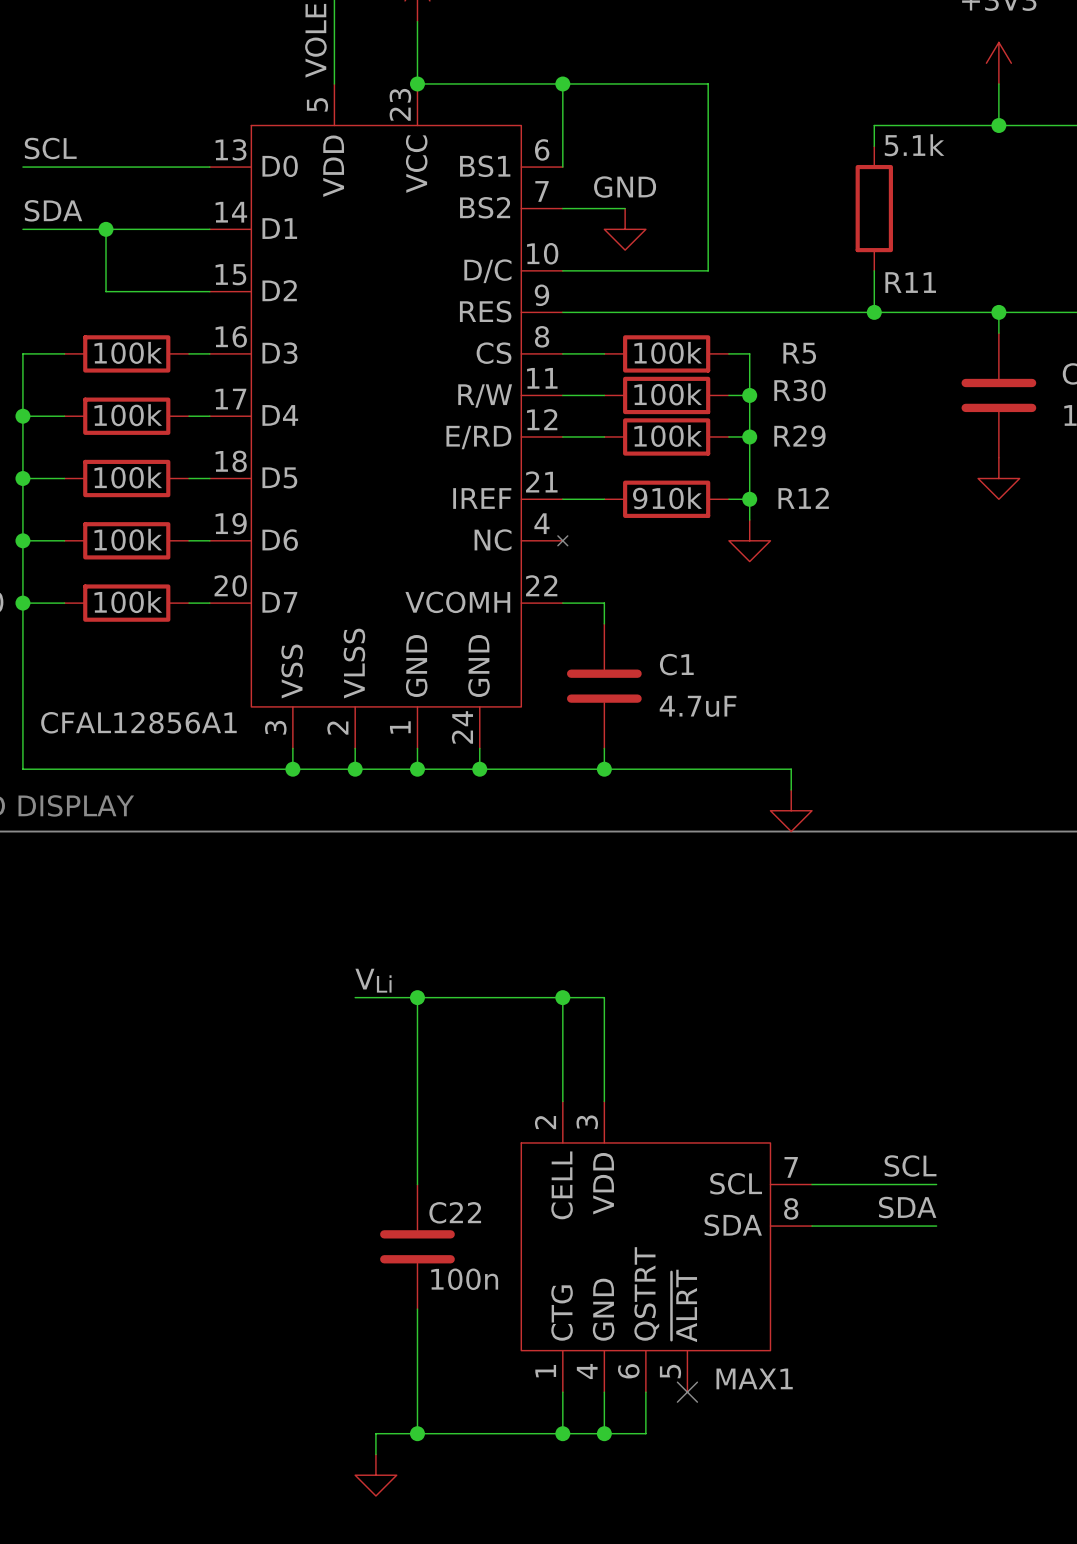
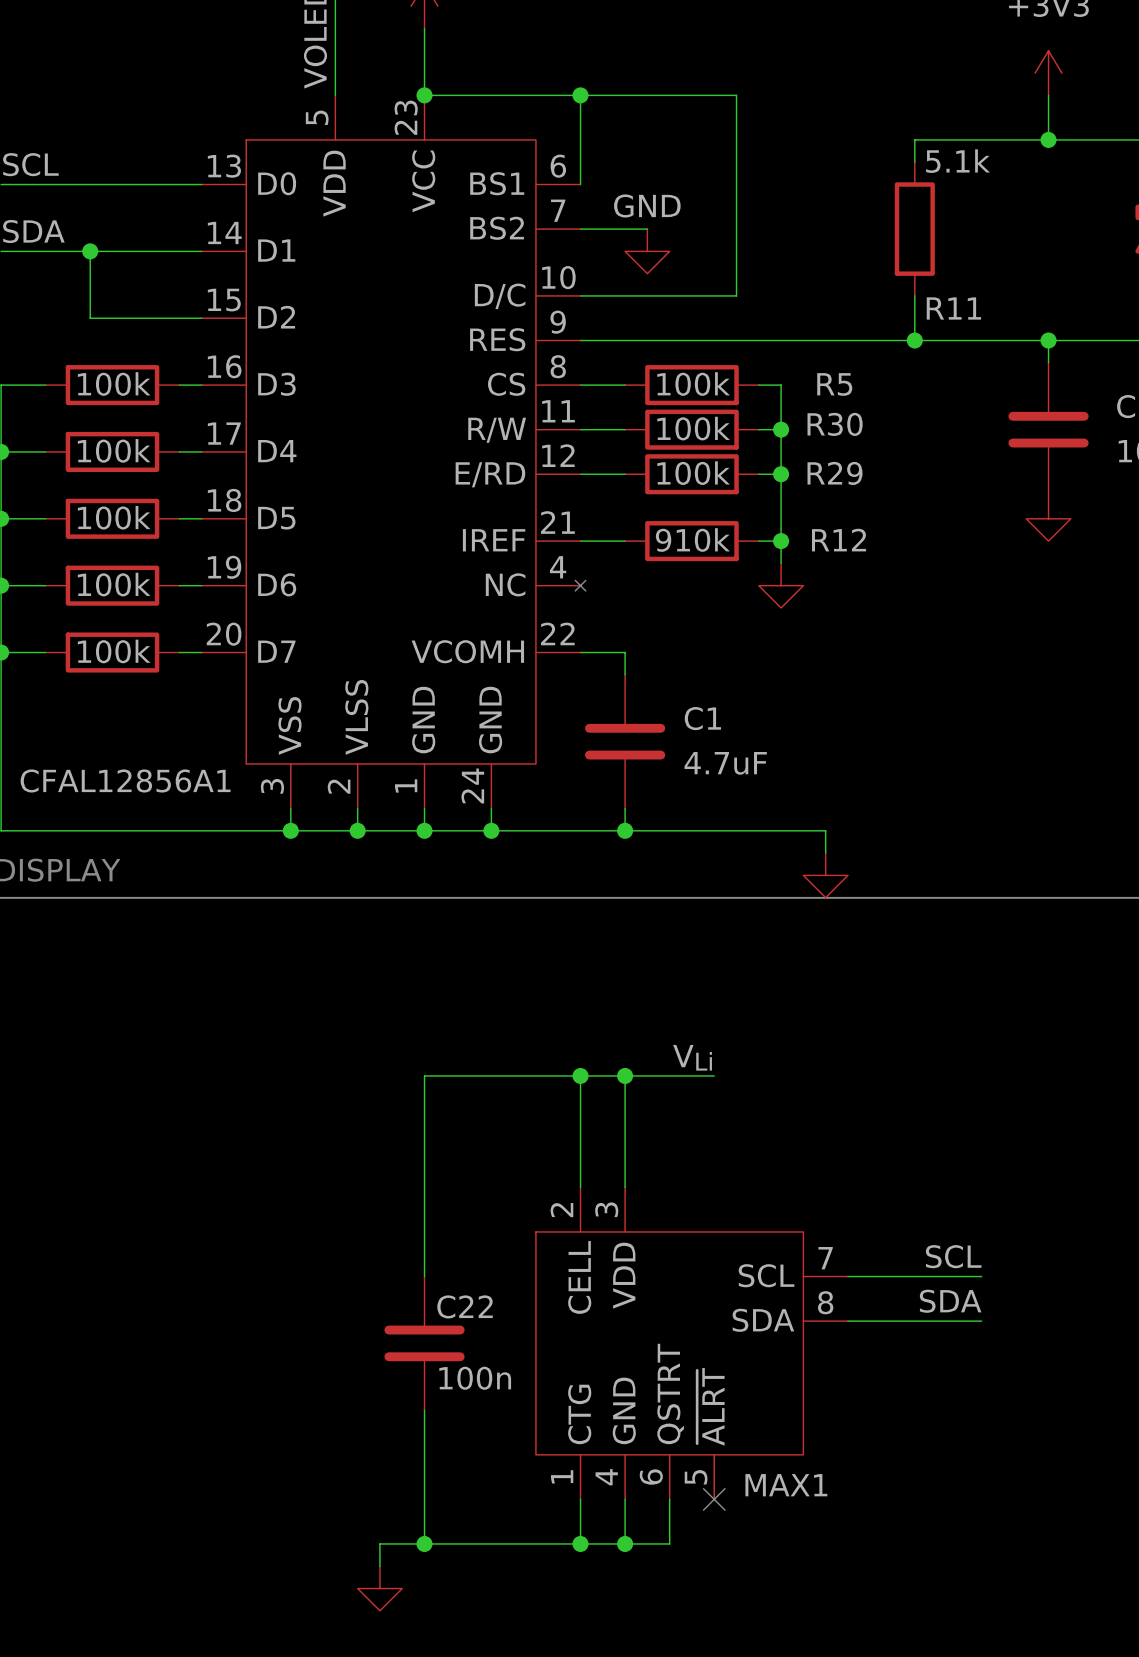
label position: VLi (373, 980) -> VLi (692, 1057)
wire: (355, 997) (417, 997) -> none
junction: (417, 997) -> none
wire: none -> (625, 1075) (714, 1075)
junction: none -> (625, 1075)

